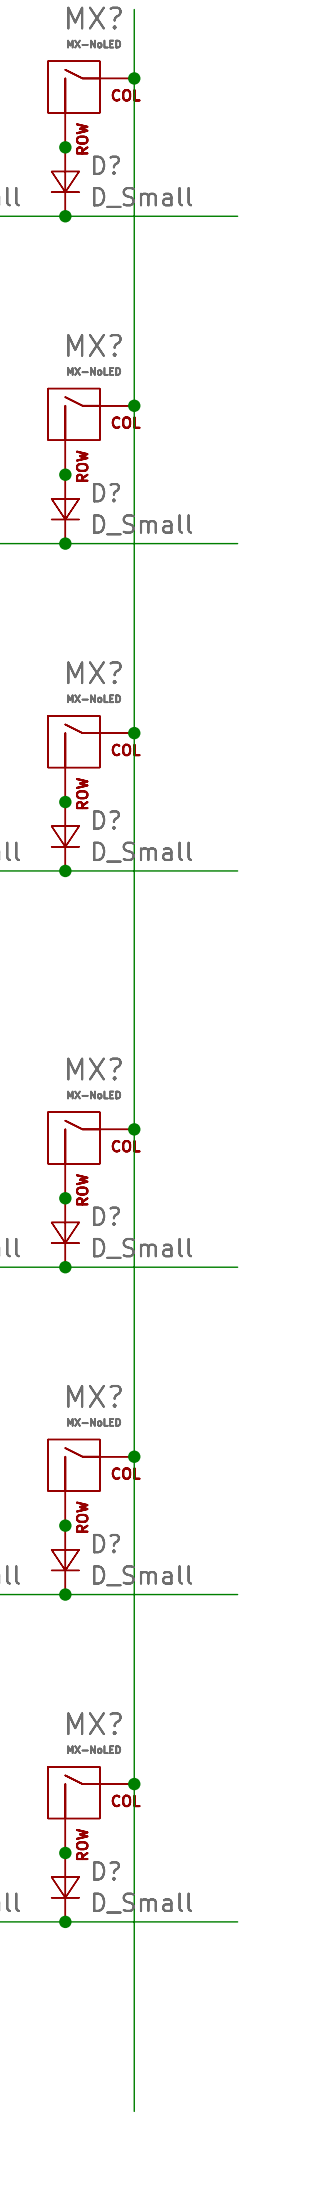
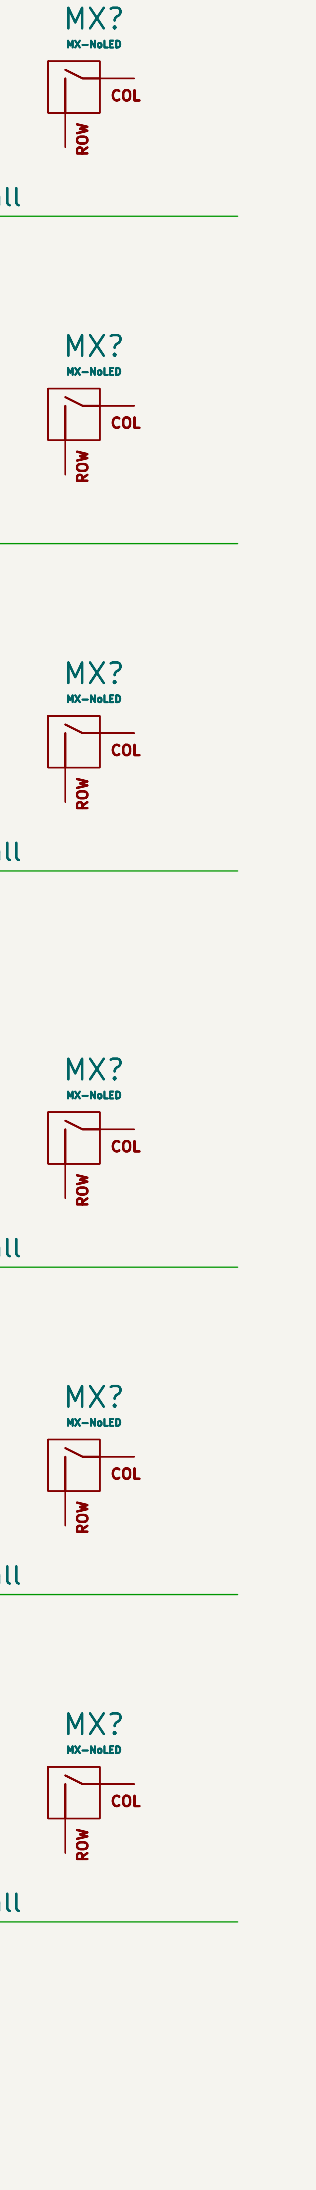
wire: (134, 9) (134, 2111) -> none
junction: (134, 78) -> none
junction: (65, 147) -> none
D?: D_Small (65, 181) -> none
junction: (65, 216) -> none
junction: (134, 405) -> none
junction: (65, 474) -> none
D?: D_Small (65, 509) -> none
junction: (65, 543) -> none
junction: (134, 733) -> none
junction: (65, 802) -> none
D?: D_Small (65, 836) -> none
junction: (65, 870) -> none
junction: (134, 1129) -> none
junction: (65, 1198) -> none
D?: D_Small (65, 1232) -> none
junction: (65, 1267) -> none
junction: (134, 1456) -> none
junction: (65, 1525) -> none
D?: D_Small (65, 1560) -> none
junction: (65, 1594) -> none
junction: (134, 1784) -> none
junction: (65, 1852) -> none
D?: D_Small (65, 1887) -> none
junction: (65, 1921) -> none

